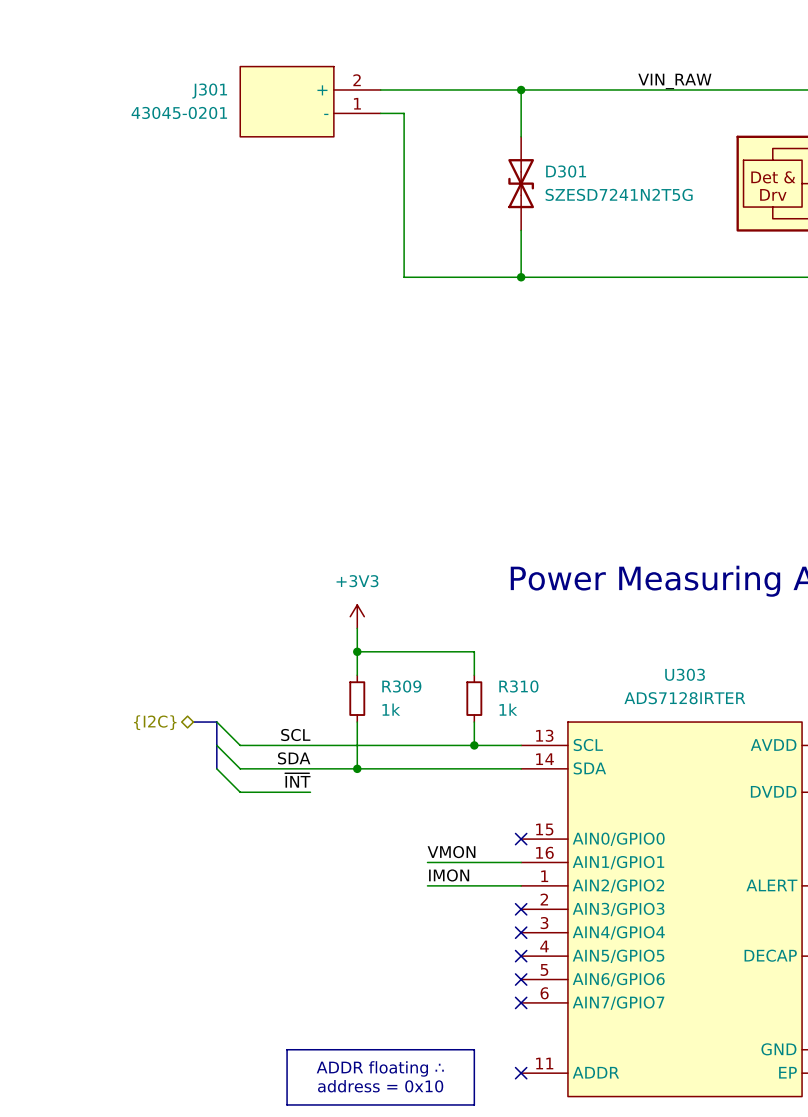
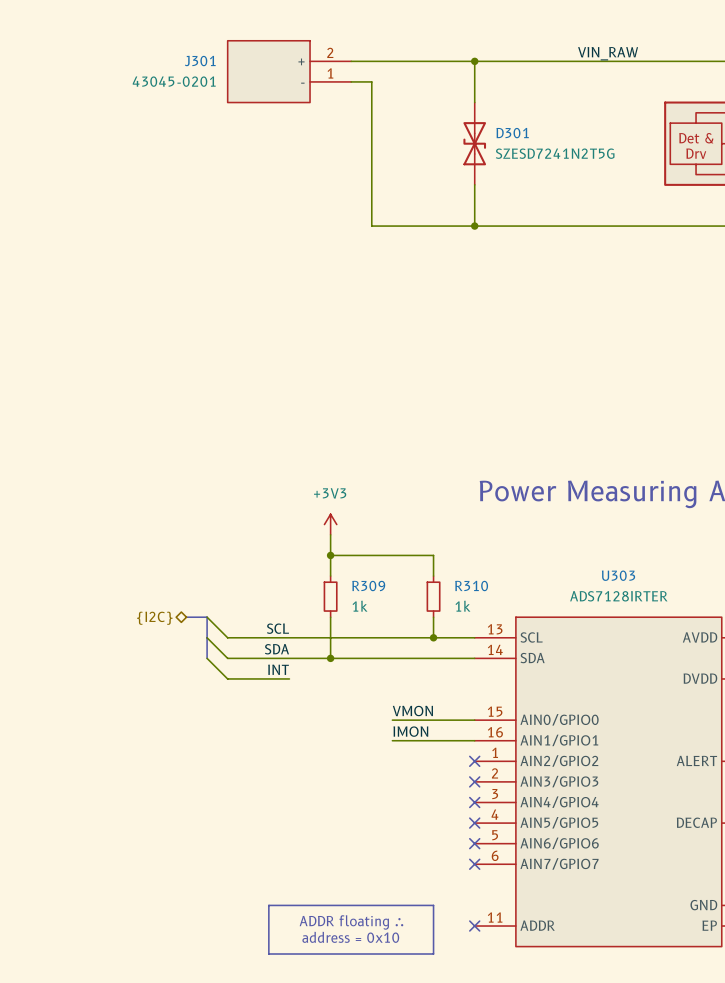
label: ~{INT} (297, 780) -> INT (278, 669)
label: none -> VMON (412, 711)
no-connect mark position: (521, 839) -> (474, 761)
label: VMON (451, 852) -> IMON (410, 731)
label: IMON (449, 875) -> none
wire: (427, 885) (521, 885) -> (392, 720) (474, 720)

